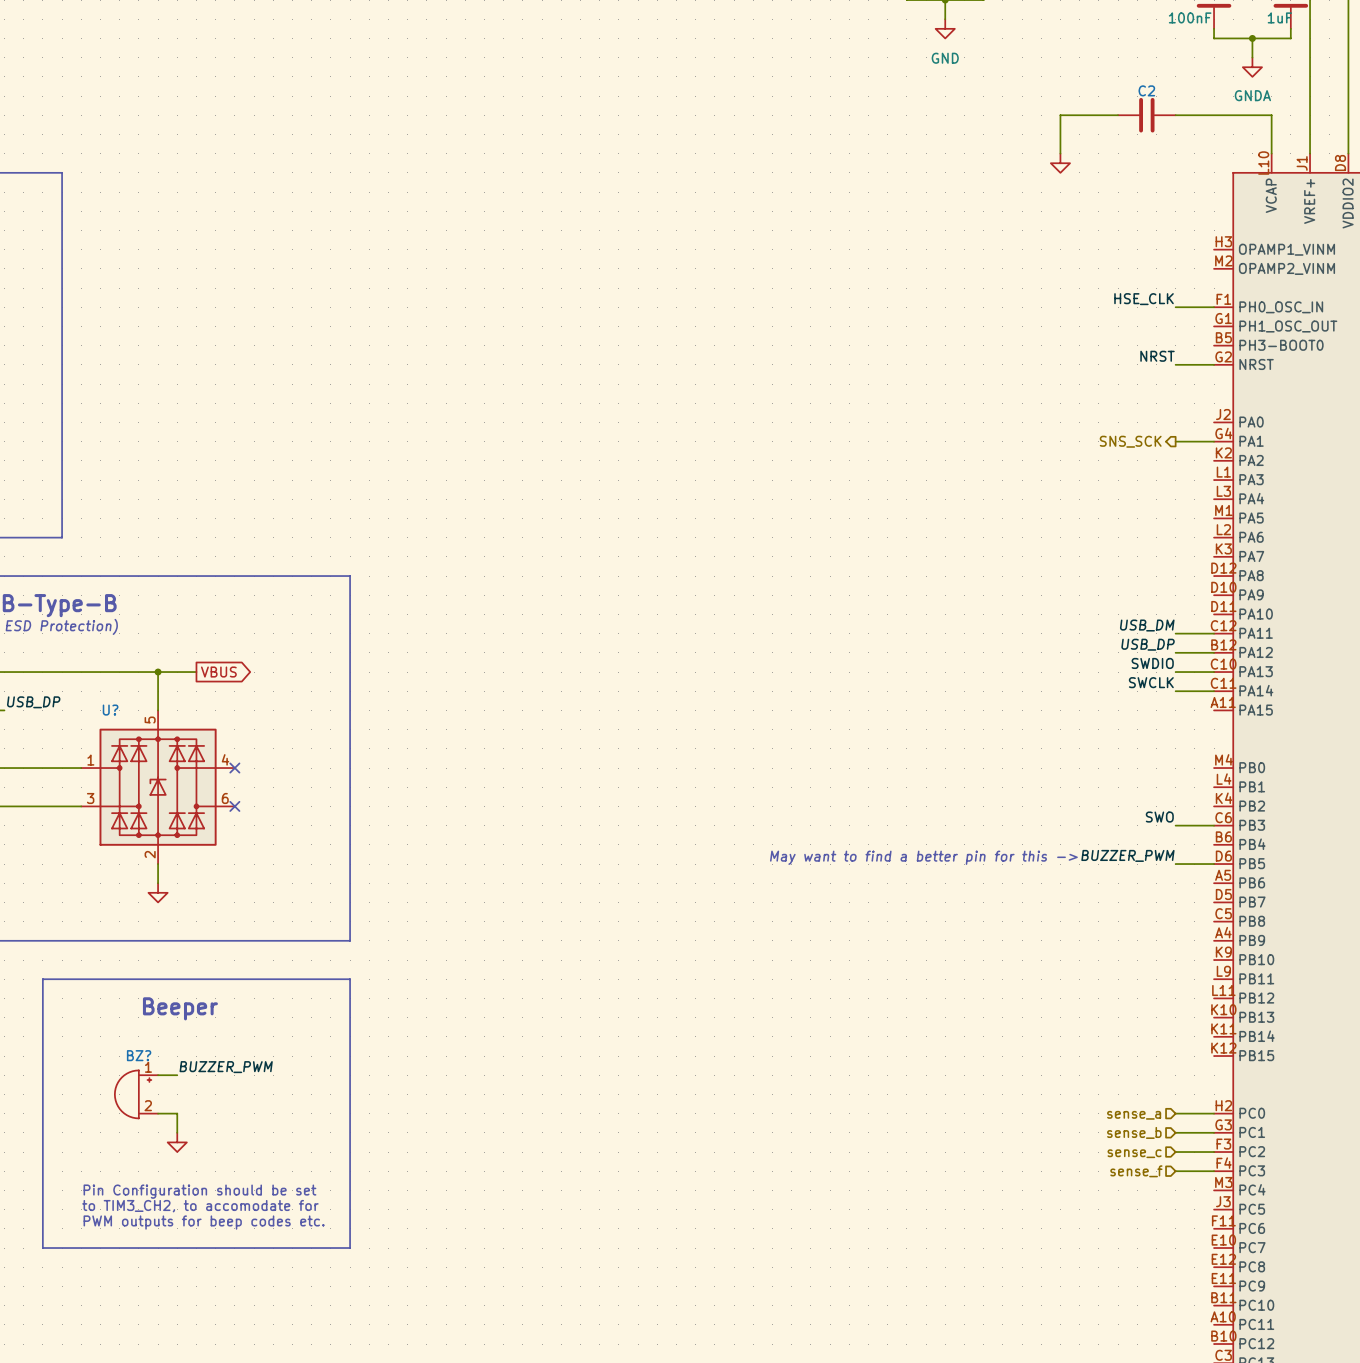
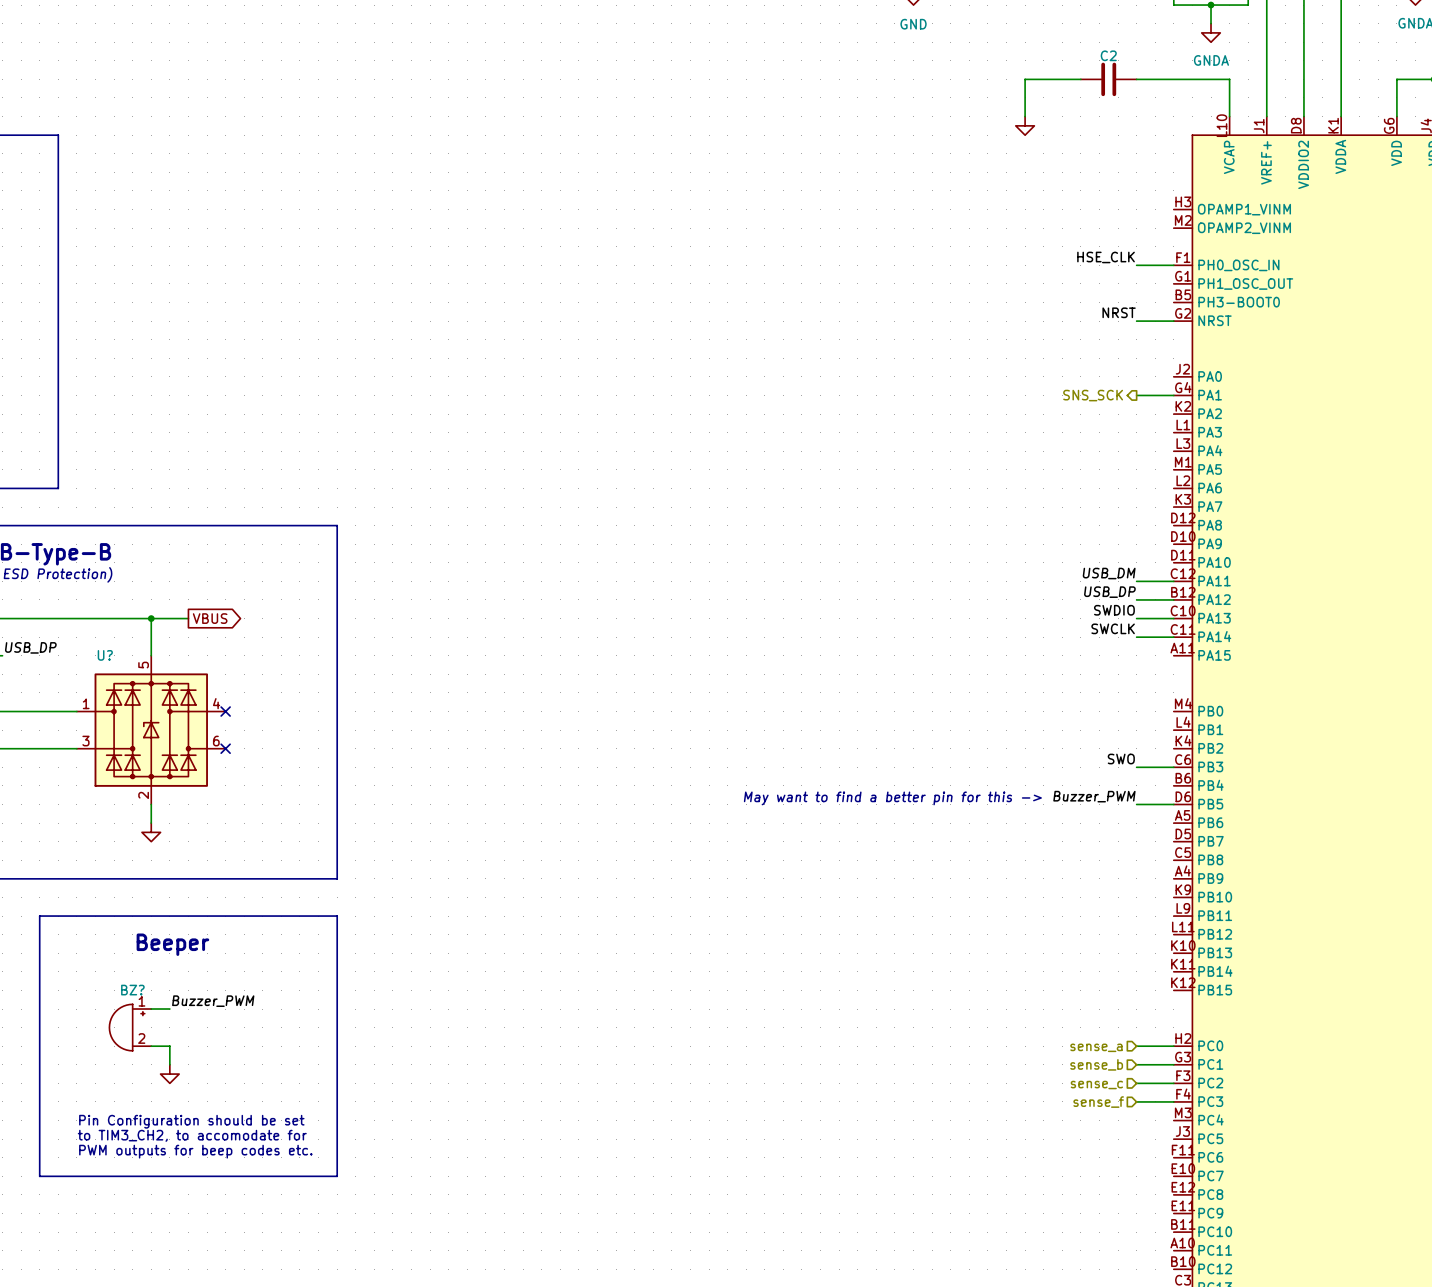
label: BUZZER_PWM (1127, 855) -> Buzzer_PWM (1094, 796)
label: BUZZER_PWM (226, 1067) -> Buzzer_PWM (213, 1001)

